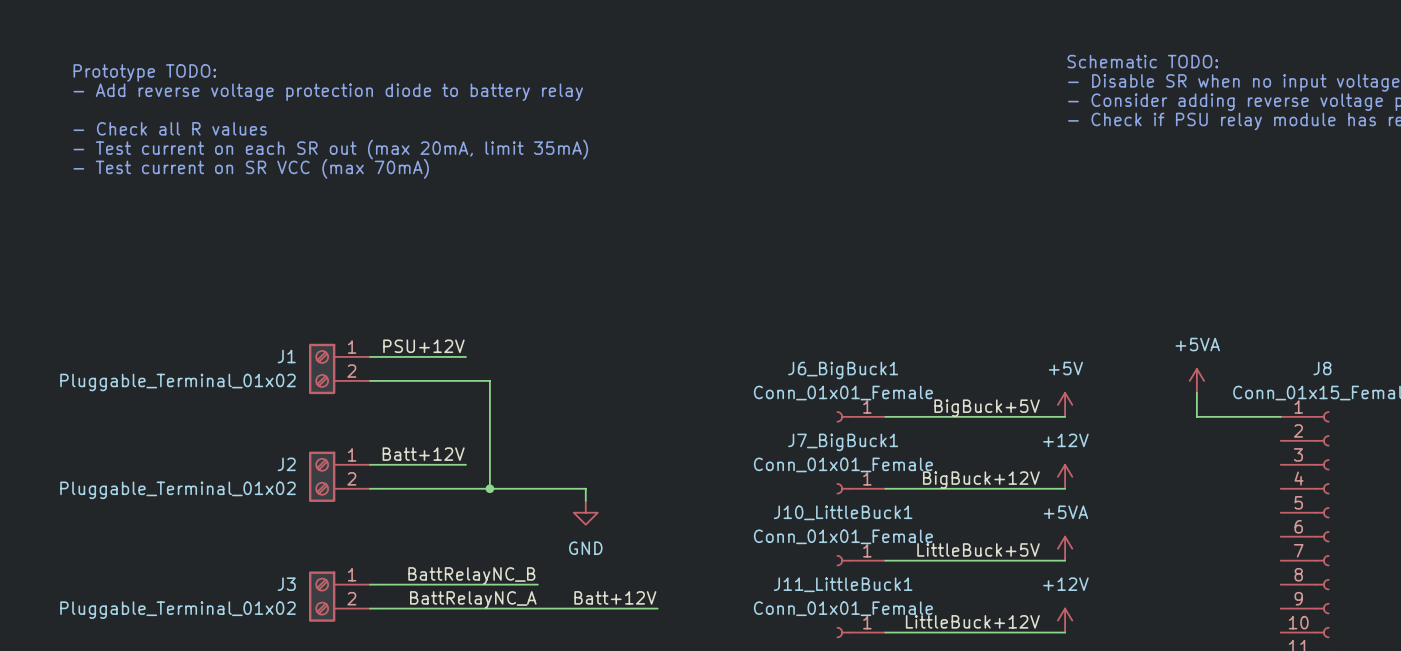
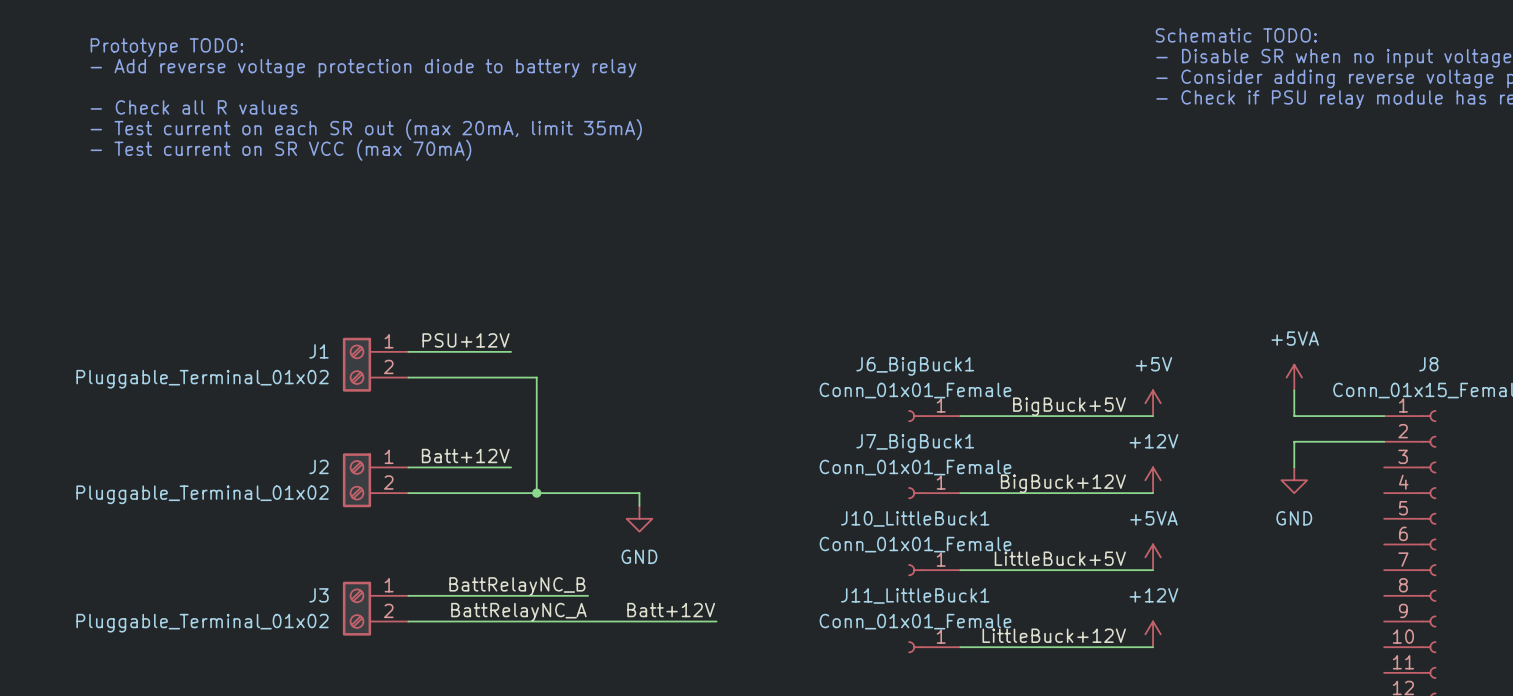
wire: none -> (1384, 441) (1294, 441) (1294, 467)
power symbol: none -> GND (1294, 480)

